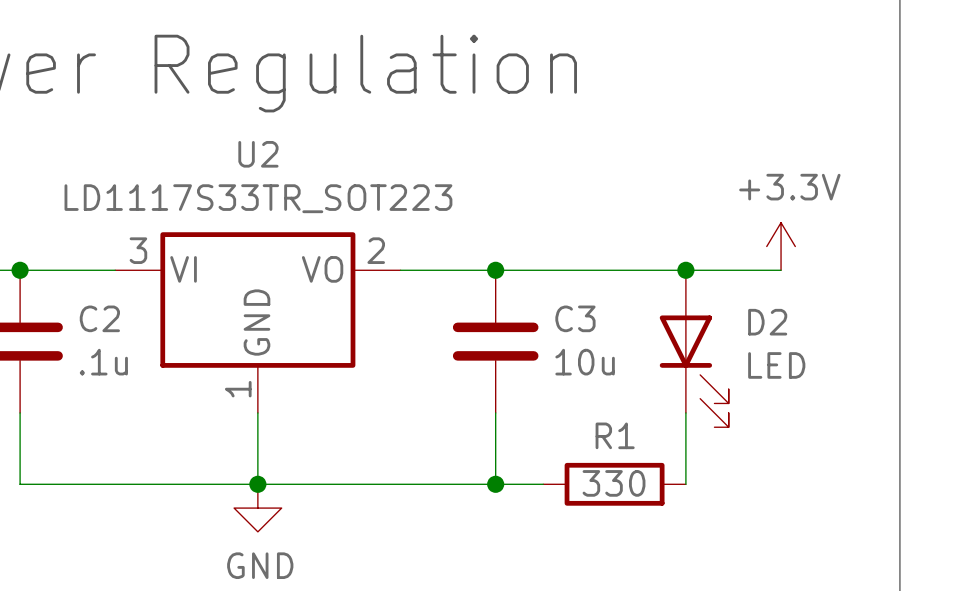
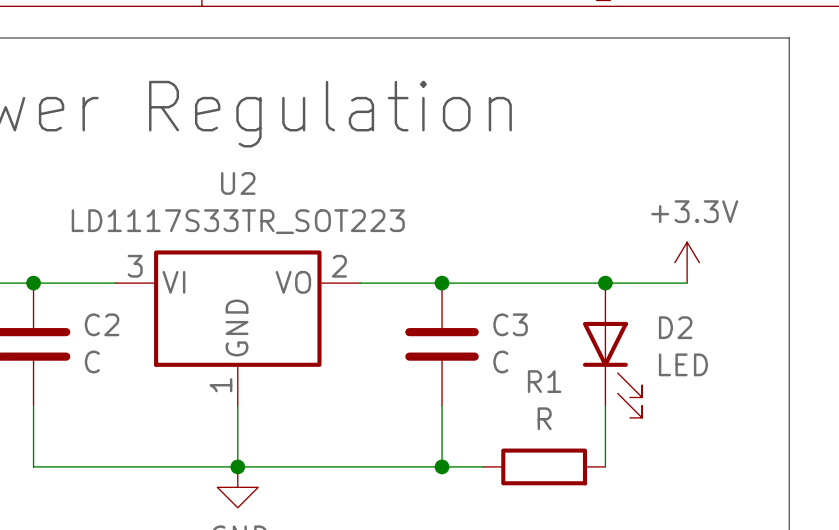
C2 value: .1u (103, 362) -> C (92, 361)
C3 value: 10u (585, 362) -> C (500, 361)
R1 name position: R1 (615, 435) -> R1 (544, 381)
R1 value: 330 (614, 483) -> R (544, 418)

